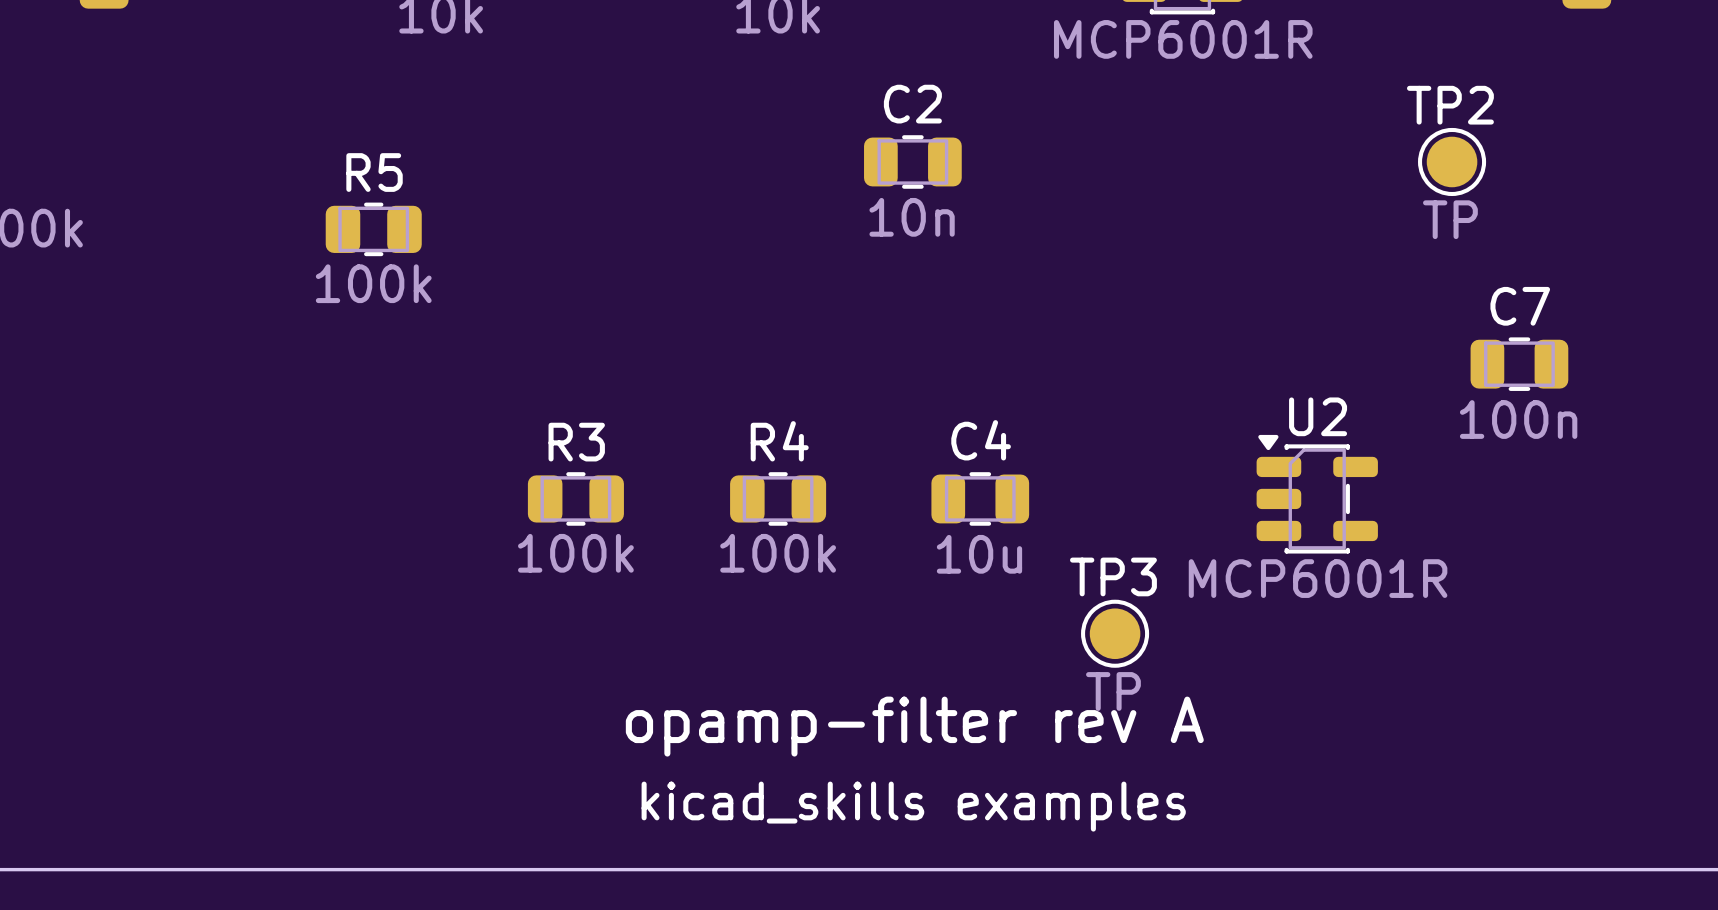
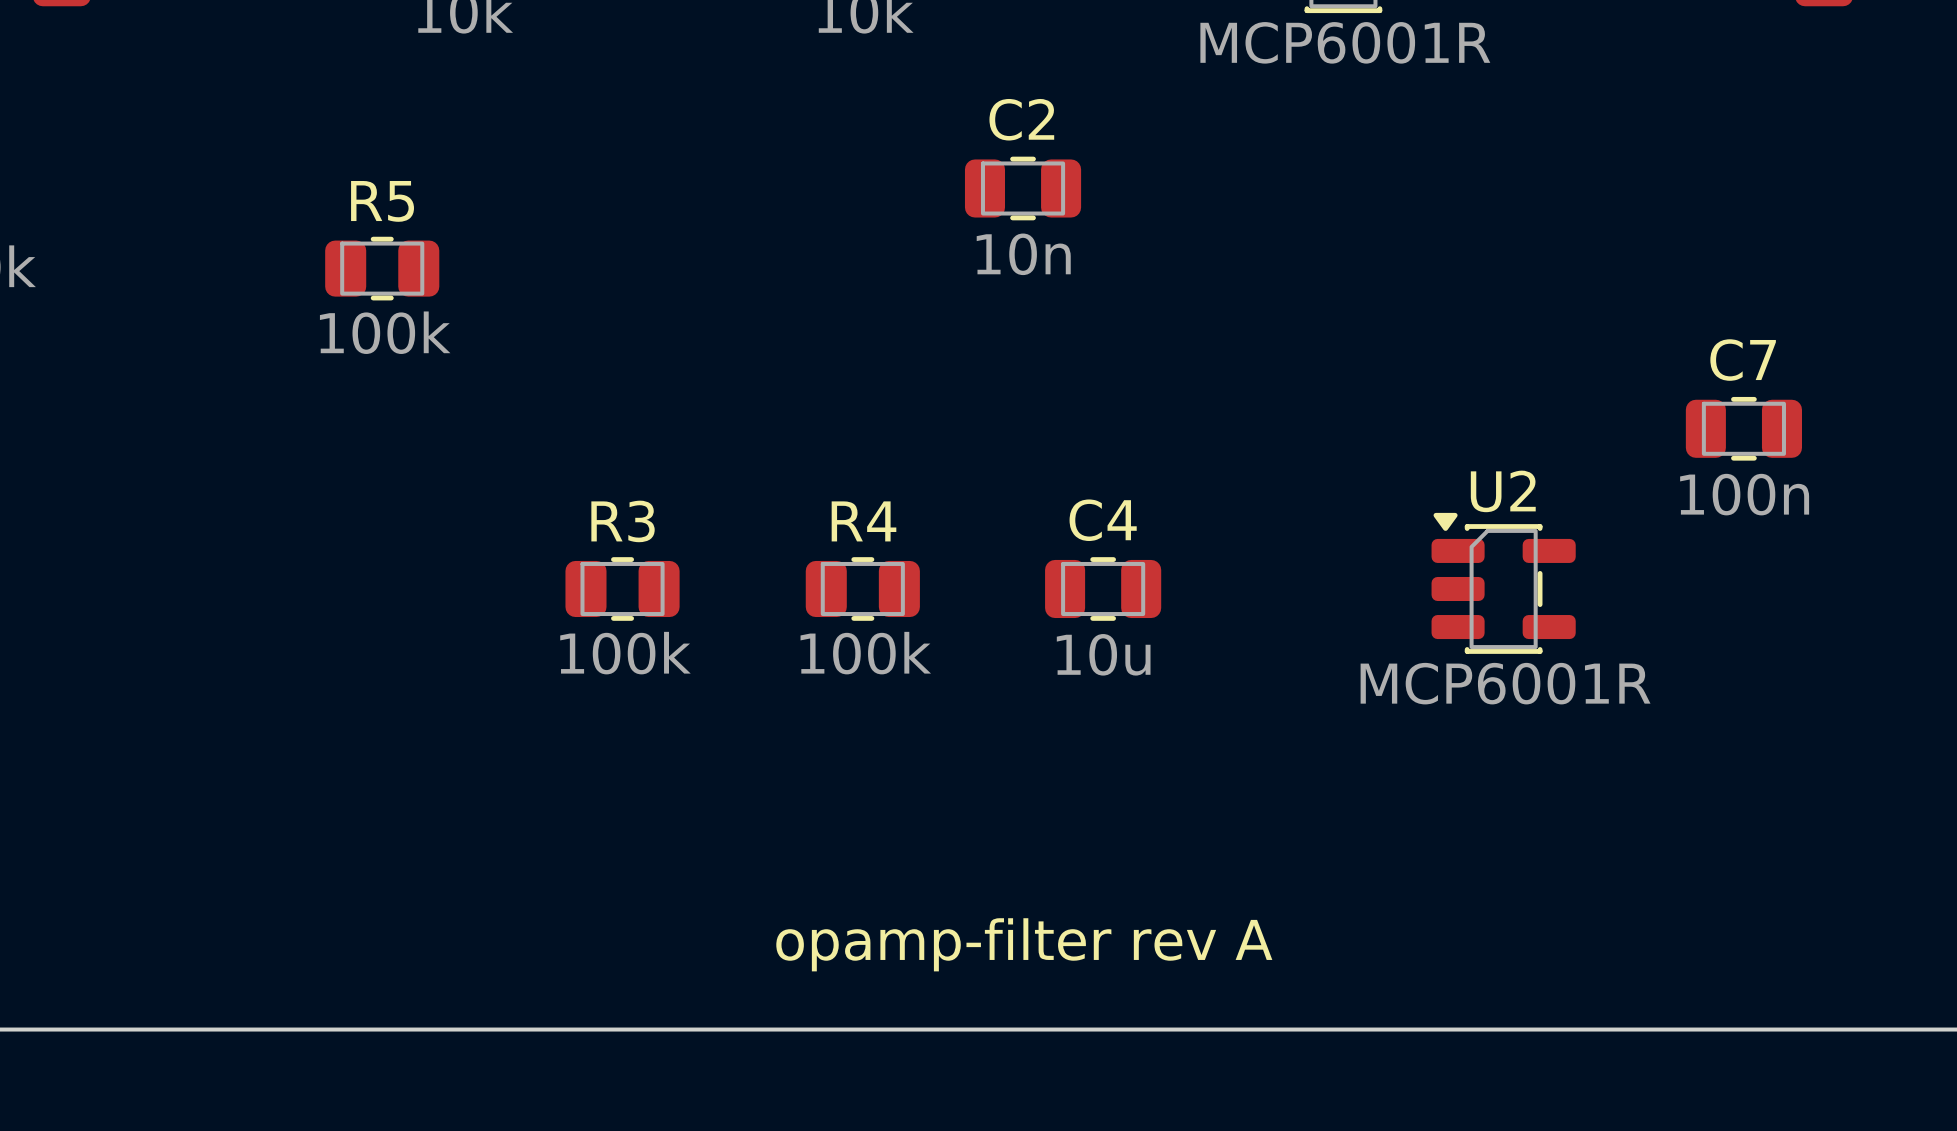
TP2: TP (1452, 161) -> none
TP3: TP (1115, 633) -> none
text: opamp-filter rev A (914, 726) -> none
text: kicad_skills examples (913, 806) -> opamp-filter rev A (1024, 944)

